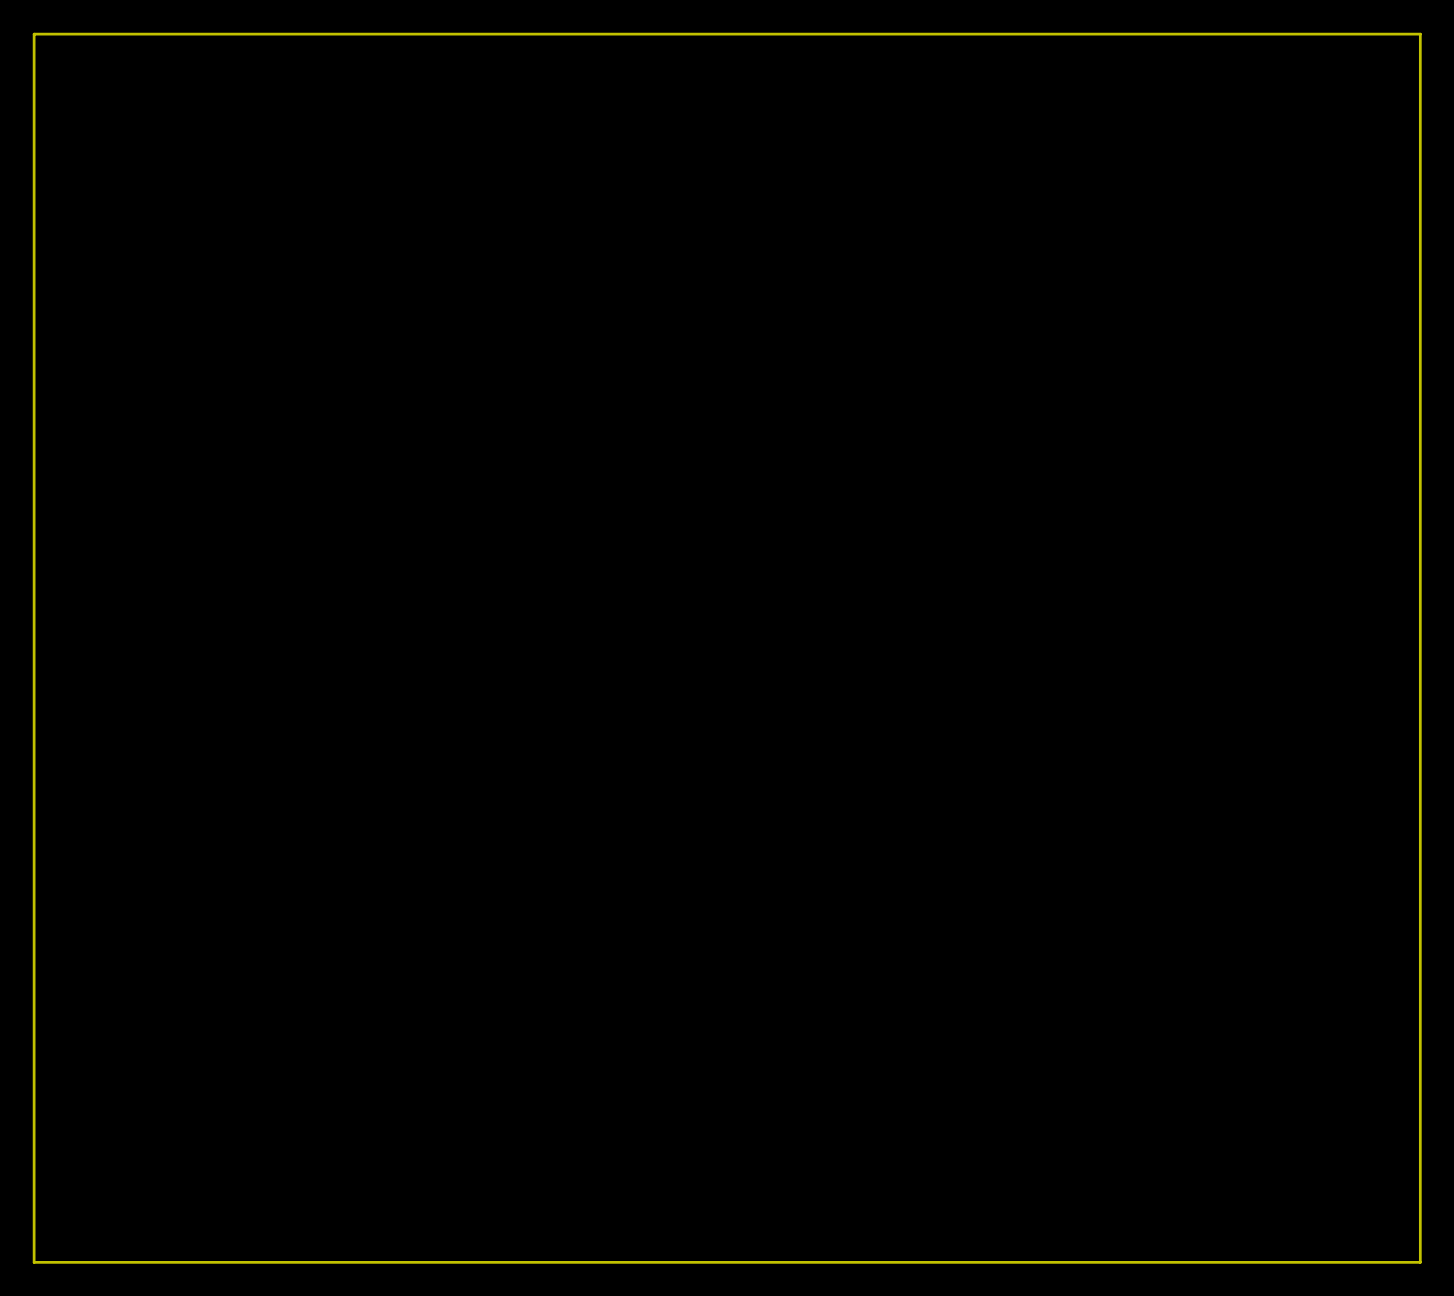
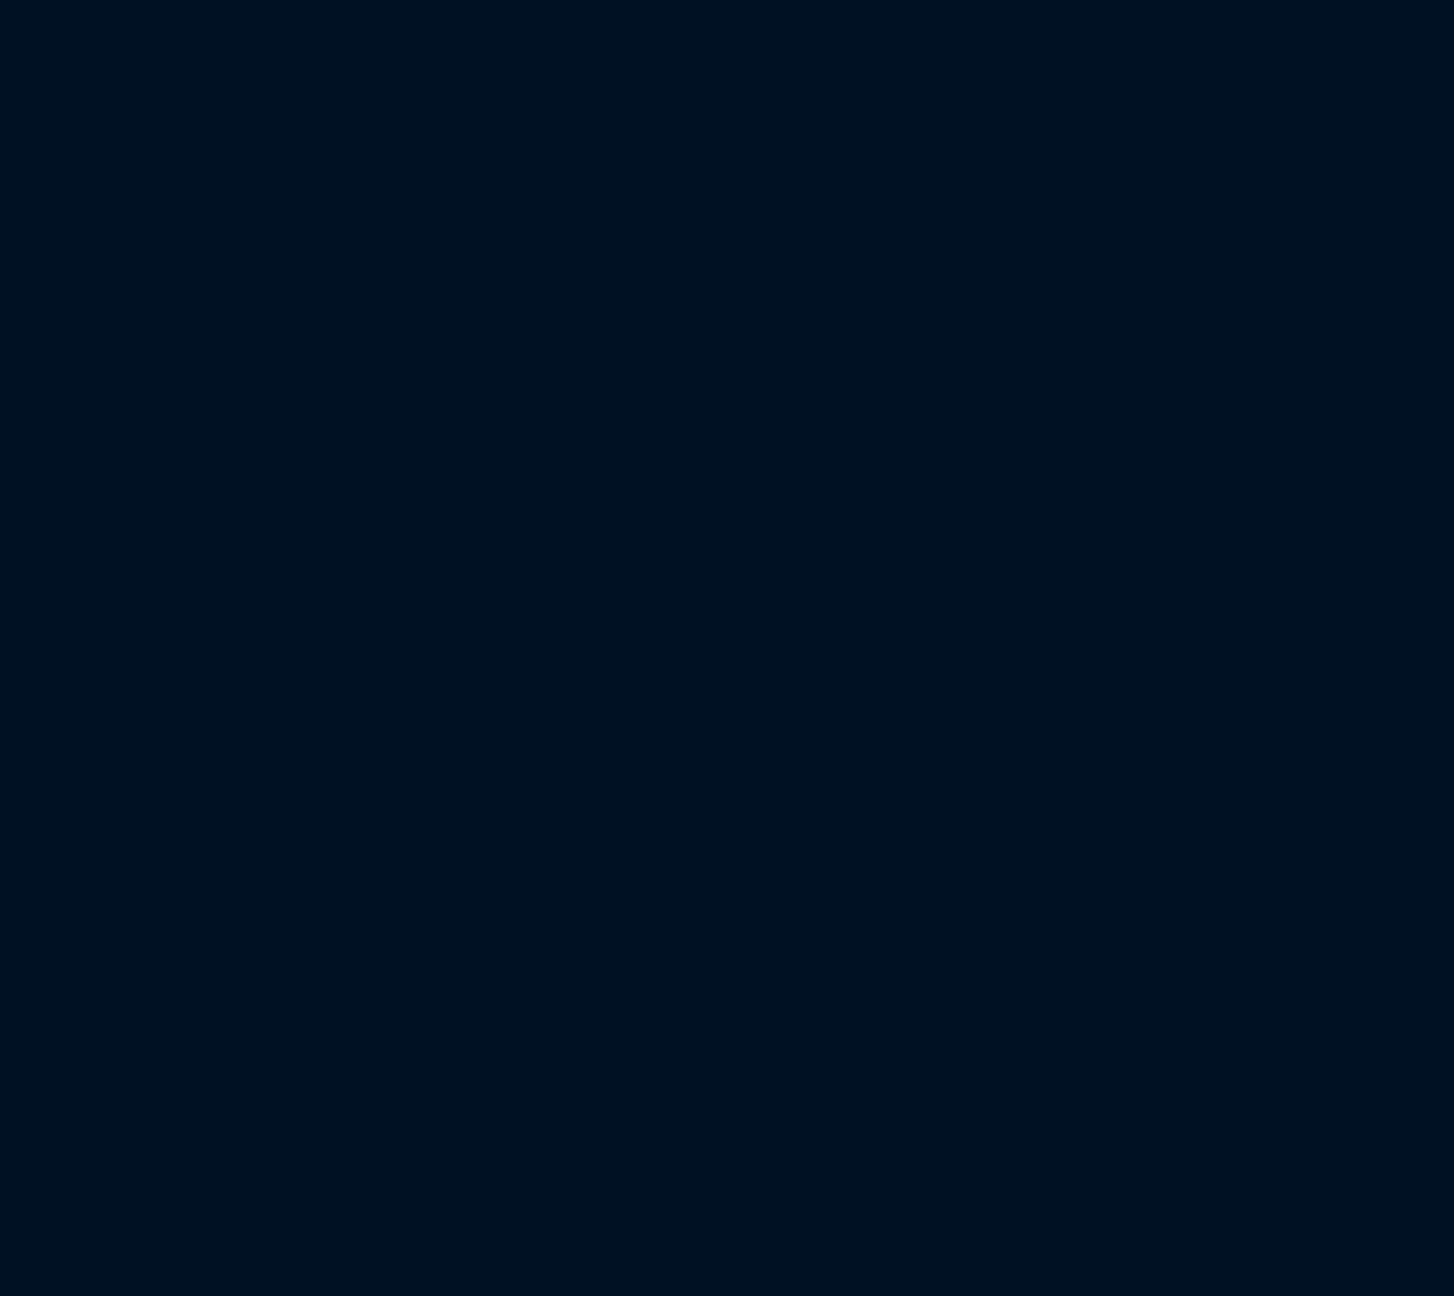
board edge: (1420, 34) (1420, 1262) (34, 1262) (34, 34) (1420, 34) -> none

